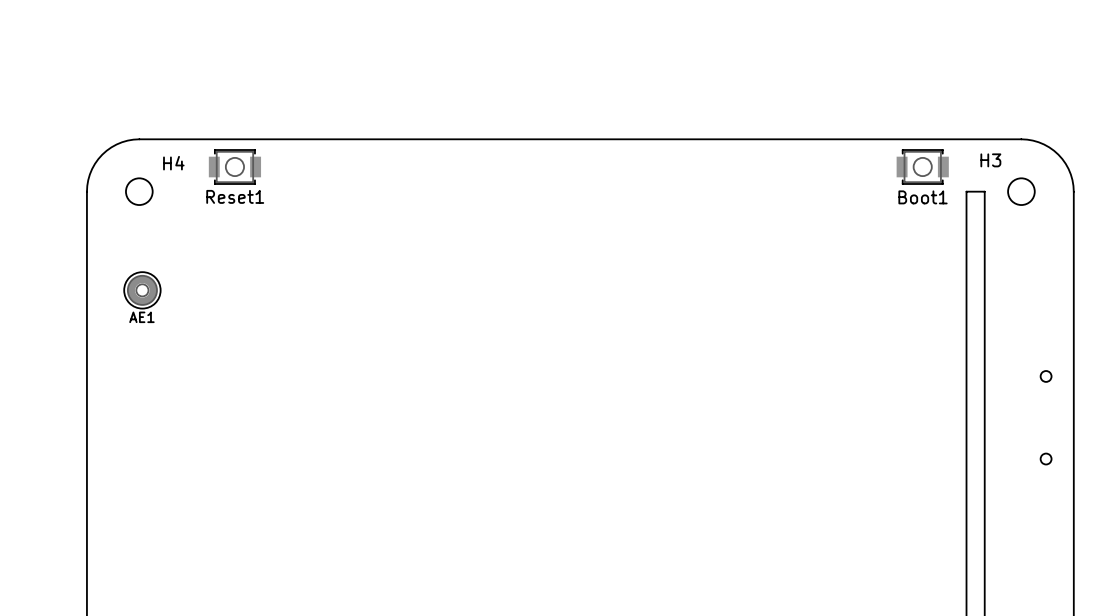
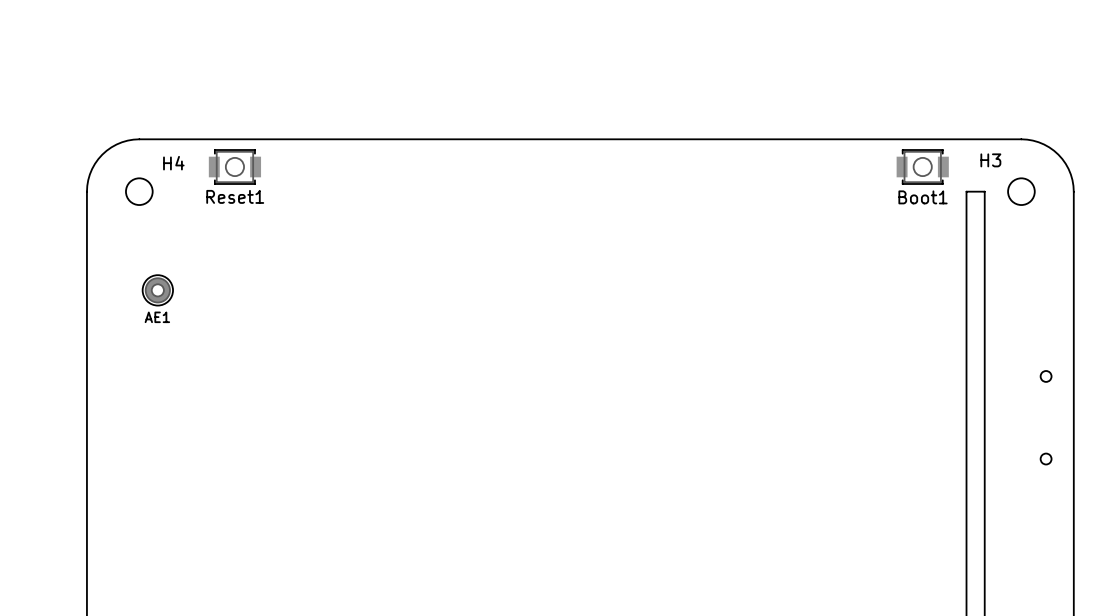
AE1 footprint: [123, 271, 162, 310] -> [141, 274, 174, 307]

